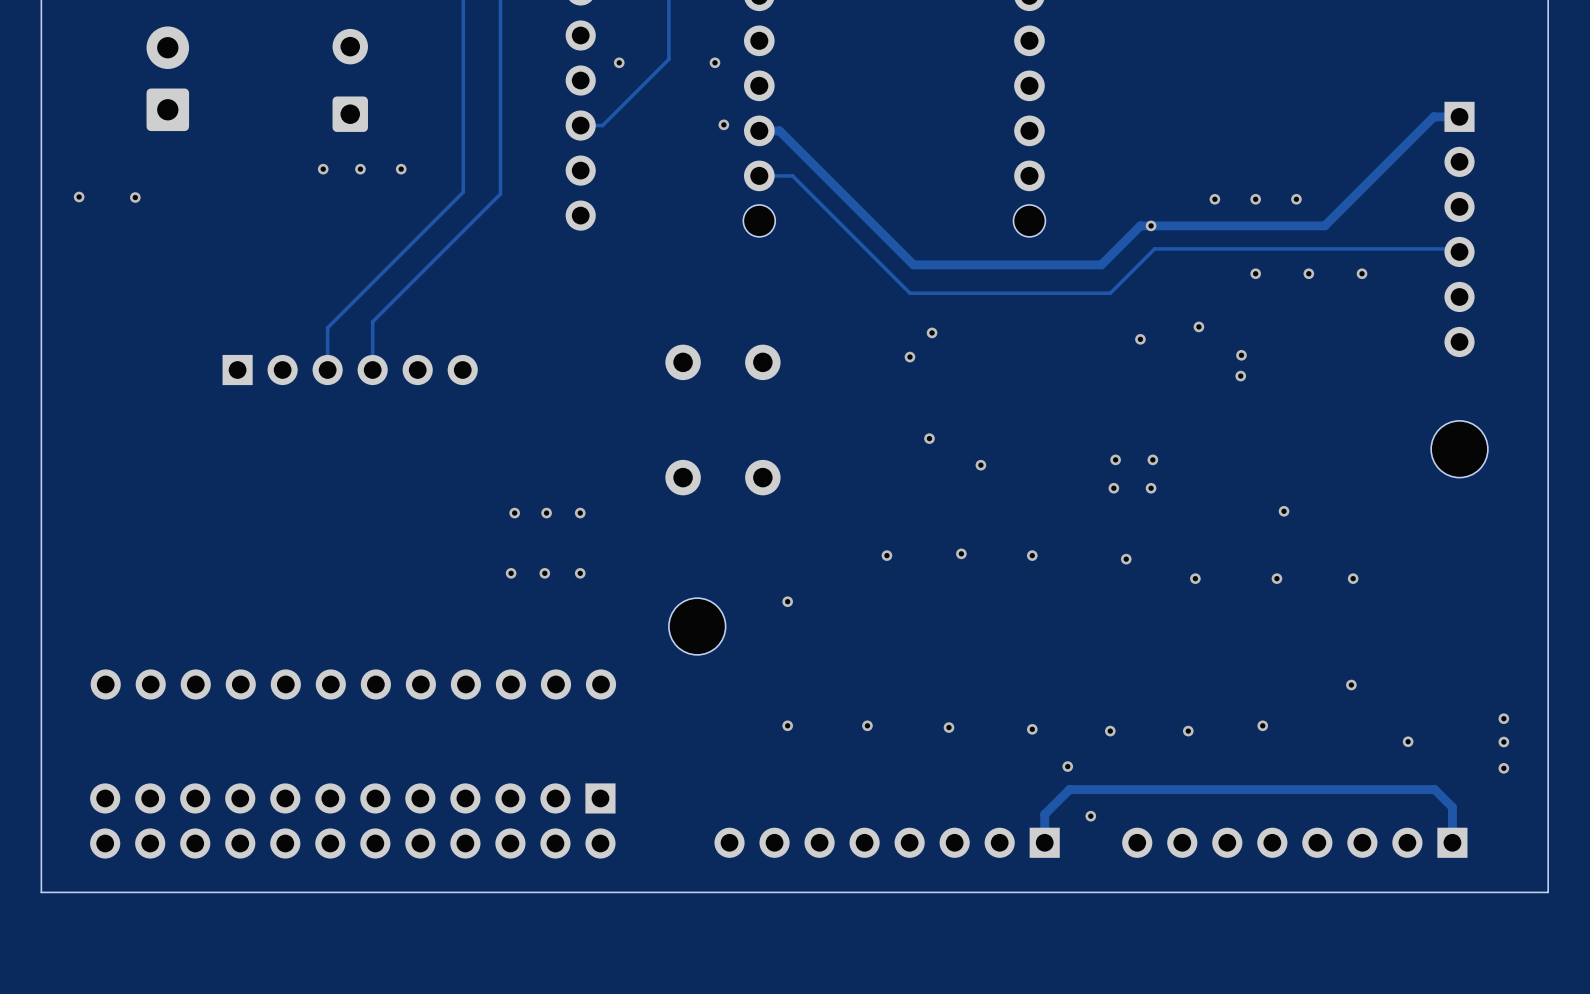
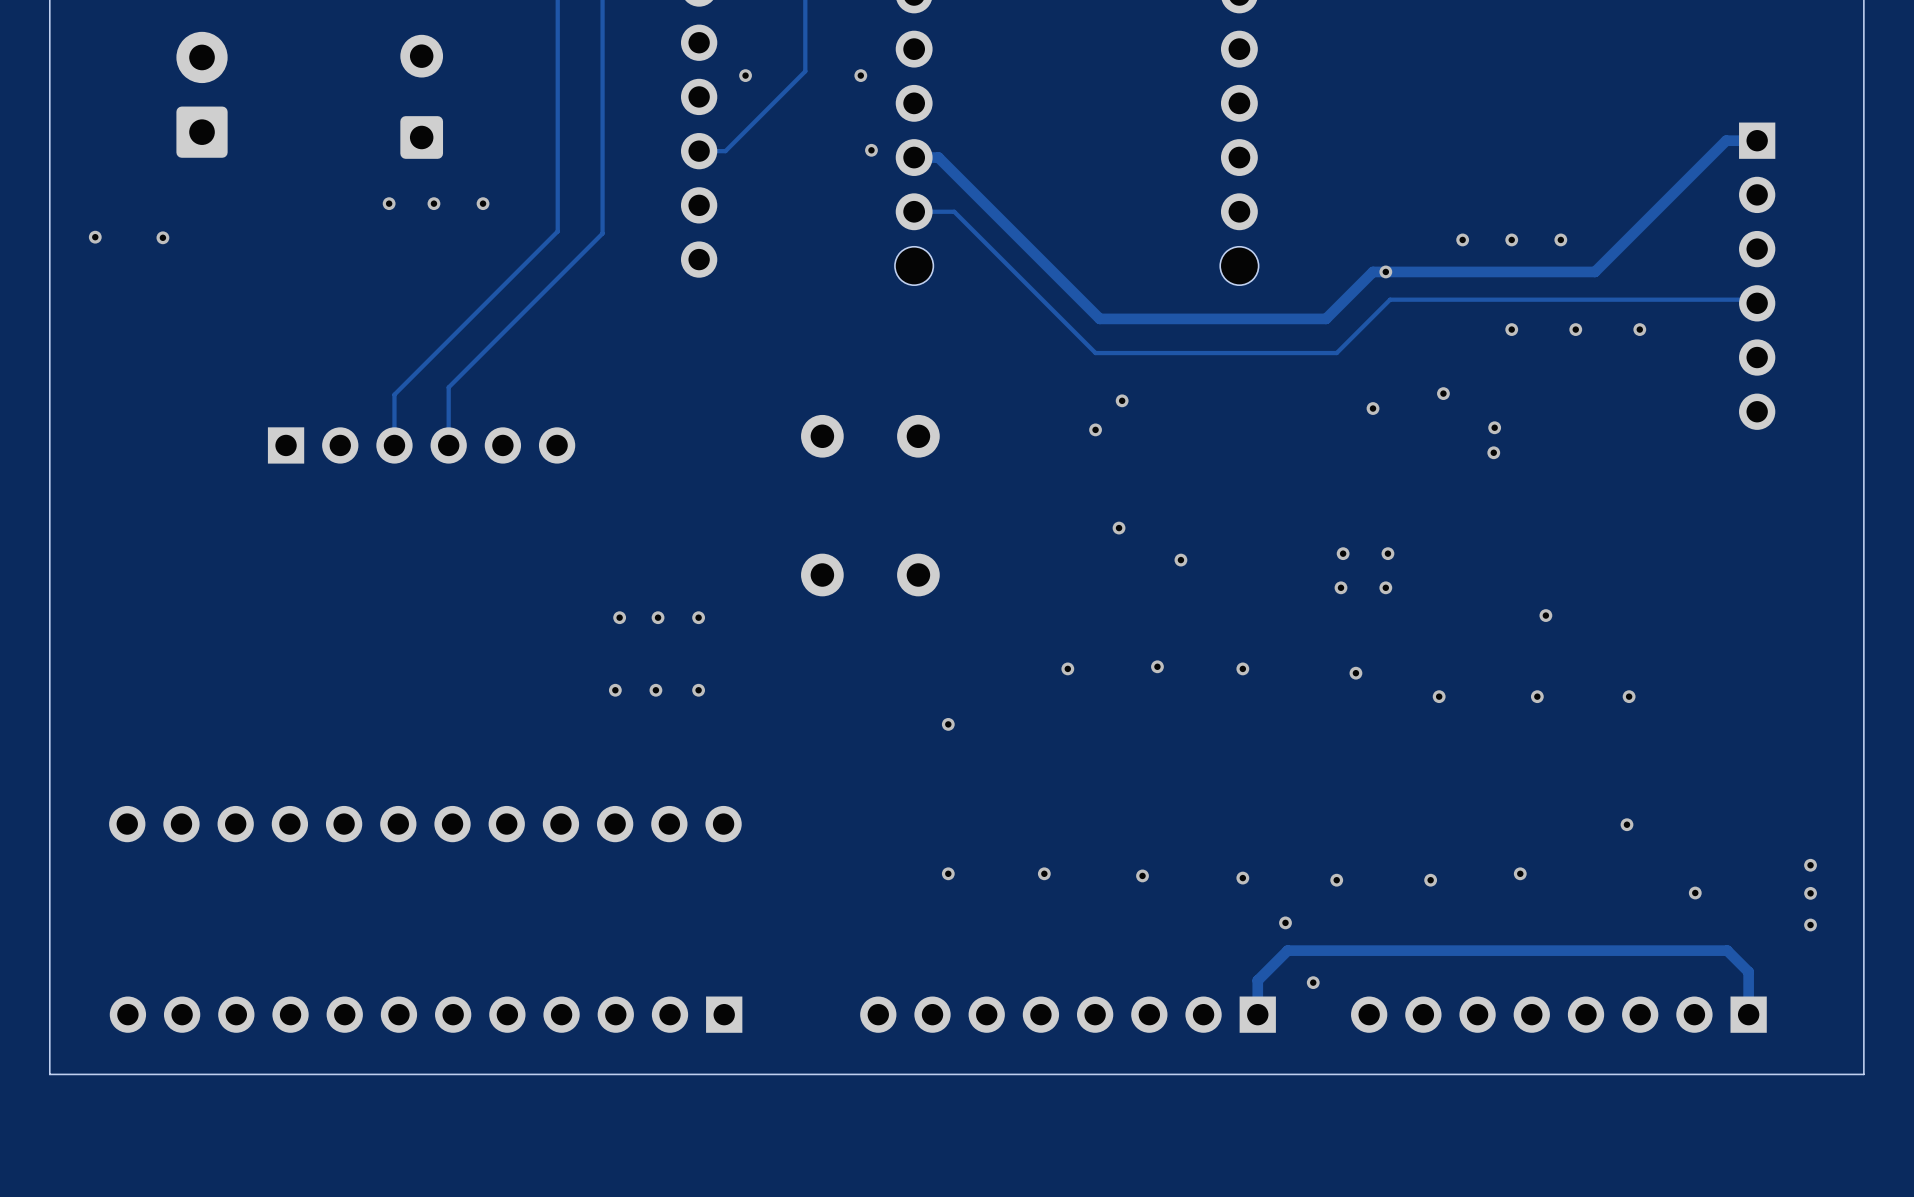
part: (1459, 449) -> none
part: (697, 626) -> none
part: (352, 820) -> none
part: none -> (426, 1014)

